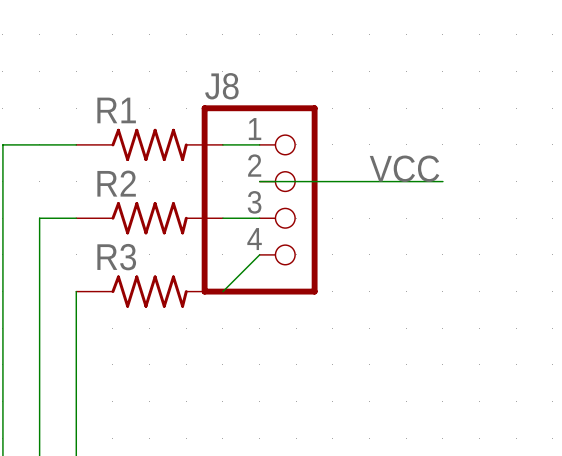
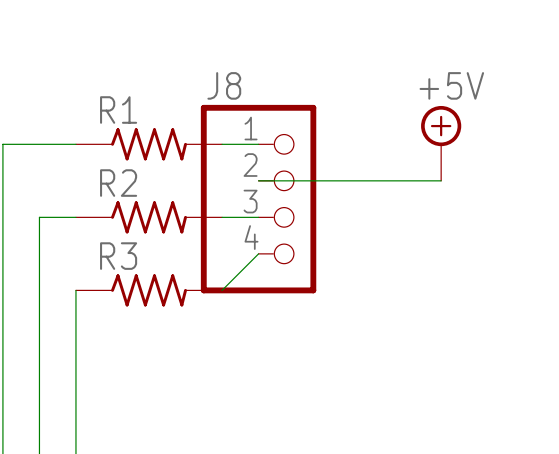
power symbol: none -> +5V (441, 143)
label: VCC (404, 168) -> none

